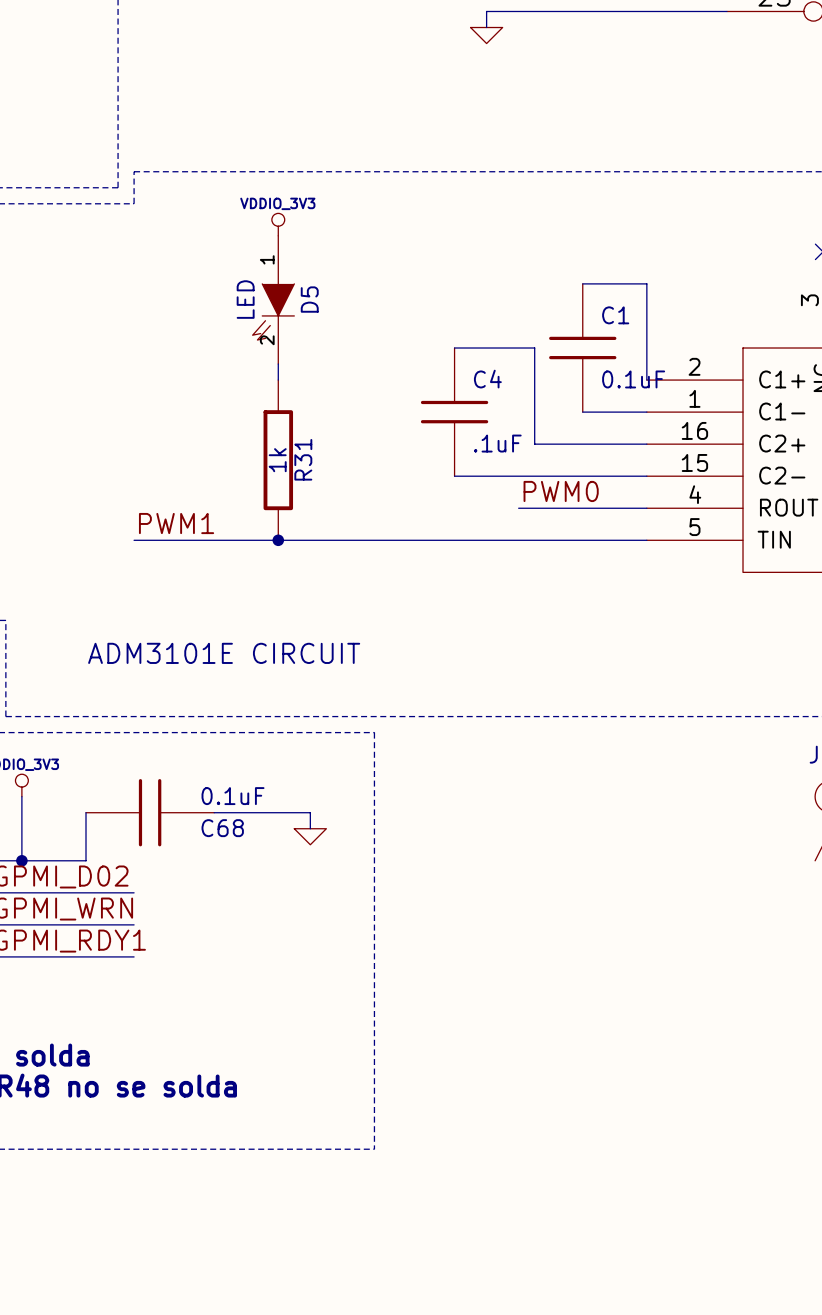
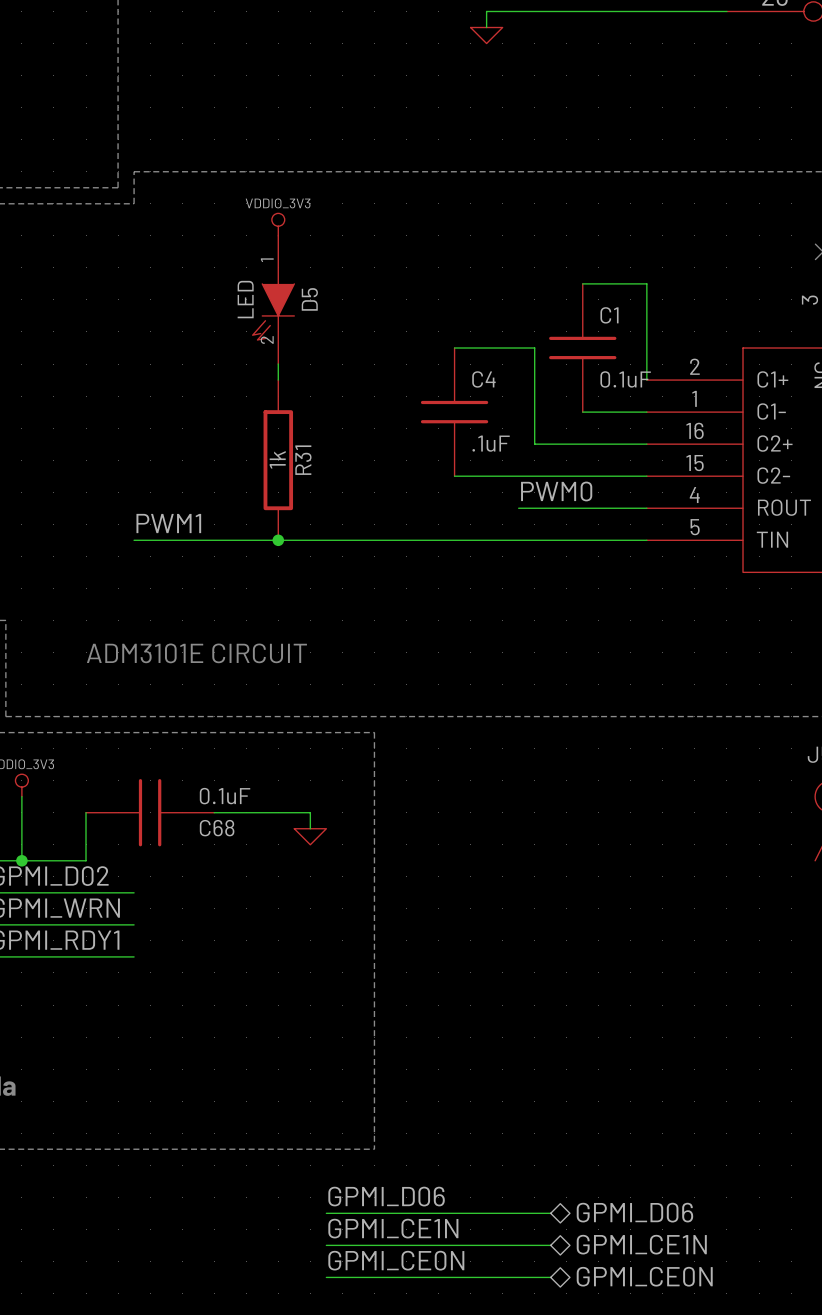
label: none -> GPMI_D06 (386, 1196)
wire: none -> (326, 1213) (550, 1213)
hierarchical label: none -> GPMI_D06 (634, 1212)
label: none -> GPMI_CE1N (393, 1228)
wire: none -> (326, 1245) (550, 1245)
hierarchical label: none -> GPMI_CE1N (641, 1244)
label: none -> GPMI_CE0N (396, 1260)
wire: none -> (326, 1277) (550, 1277)
hierarchical label: none -> GPMI_CE0N (644, 1276)

